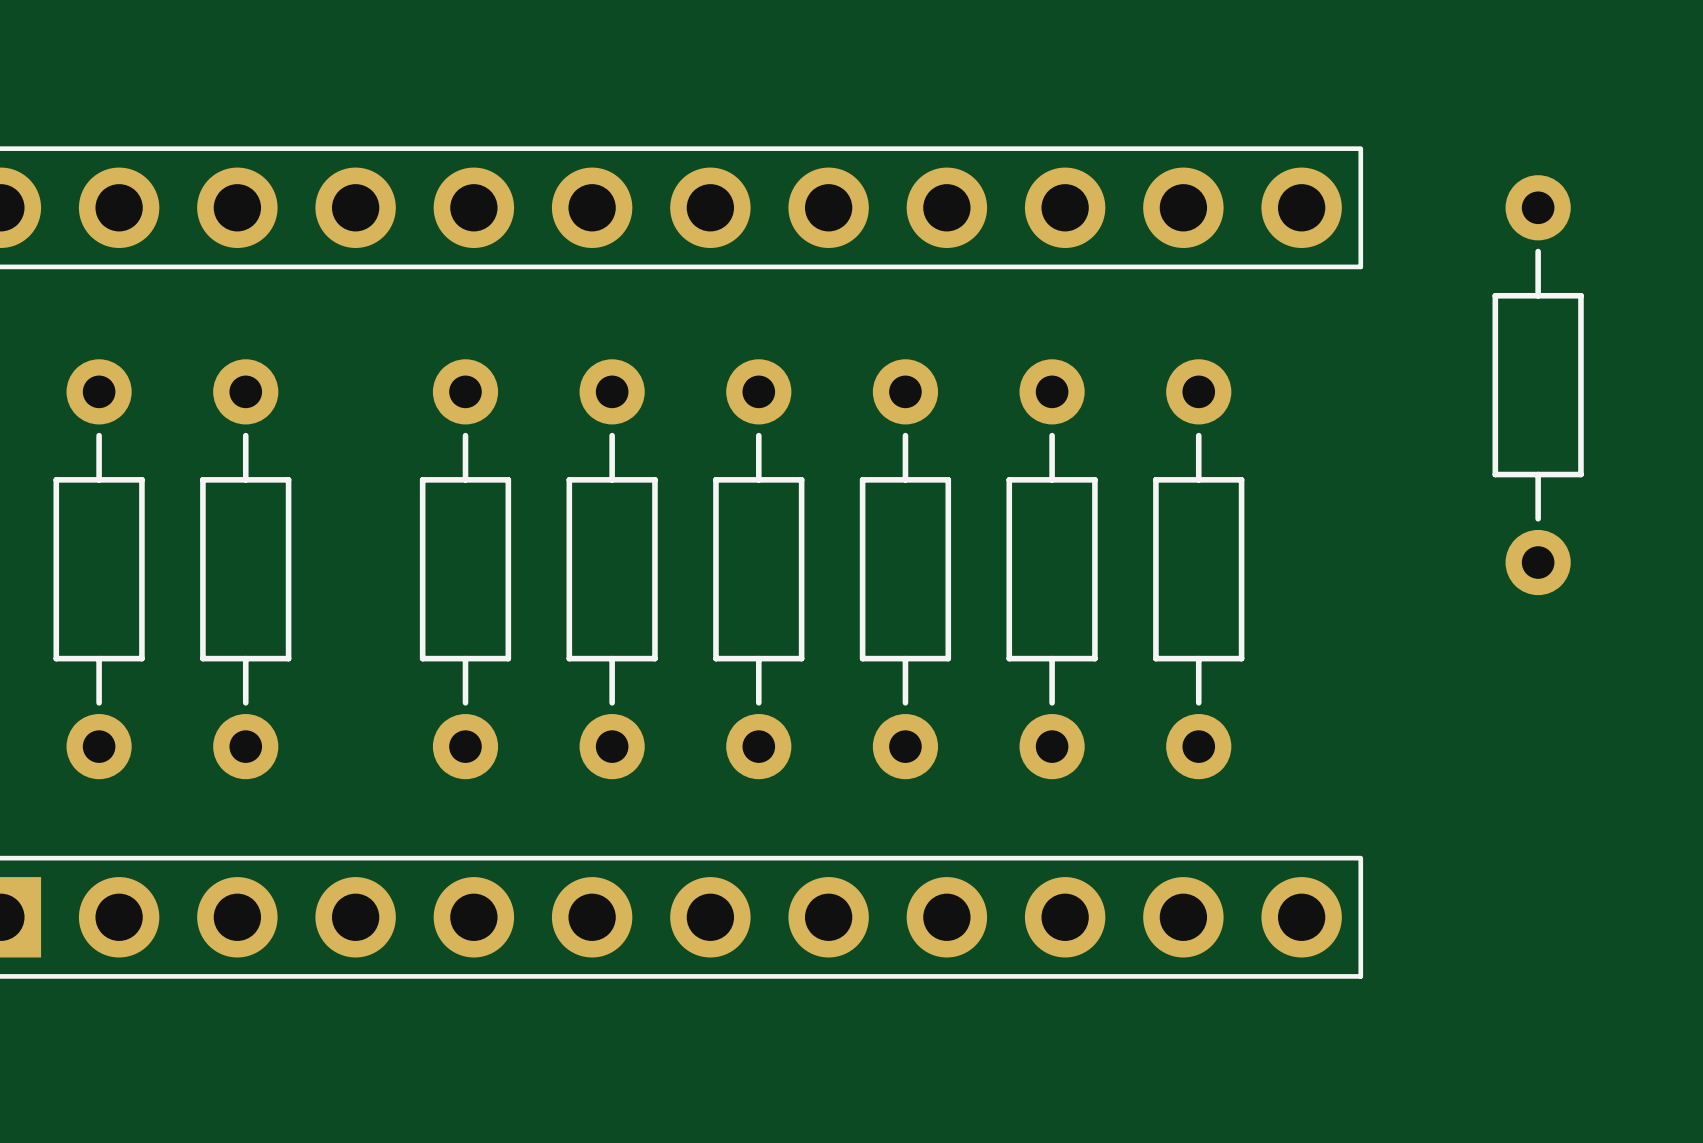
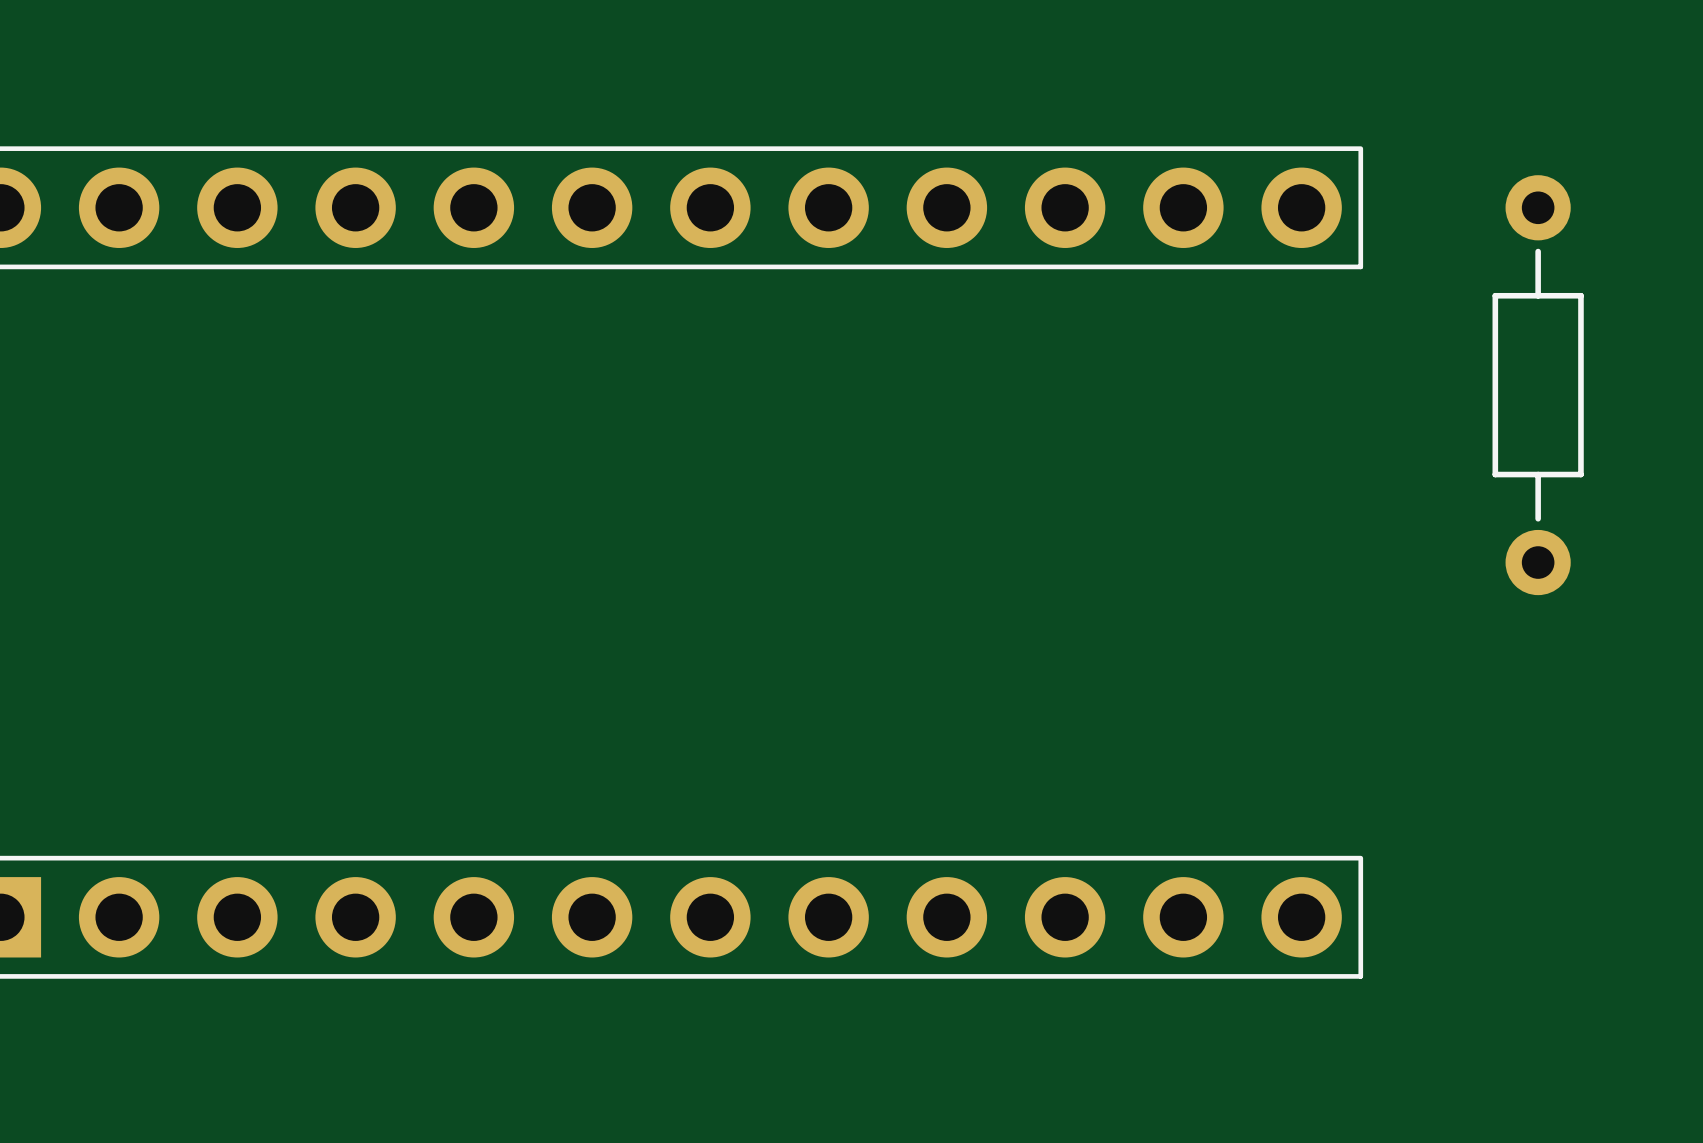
part: (99, 569) -> none
part: (245, 569) -> none
part: (465, 569) -> none
part: (612, 569) -> none
part: (758, 569) -> none
part: (905, 569) -> none
part: (1052, 569) -> none
part: (1198, 569) -> none

